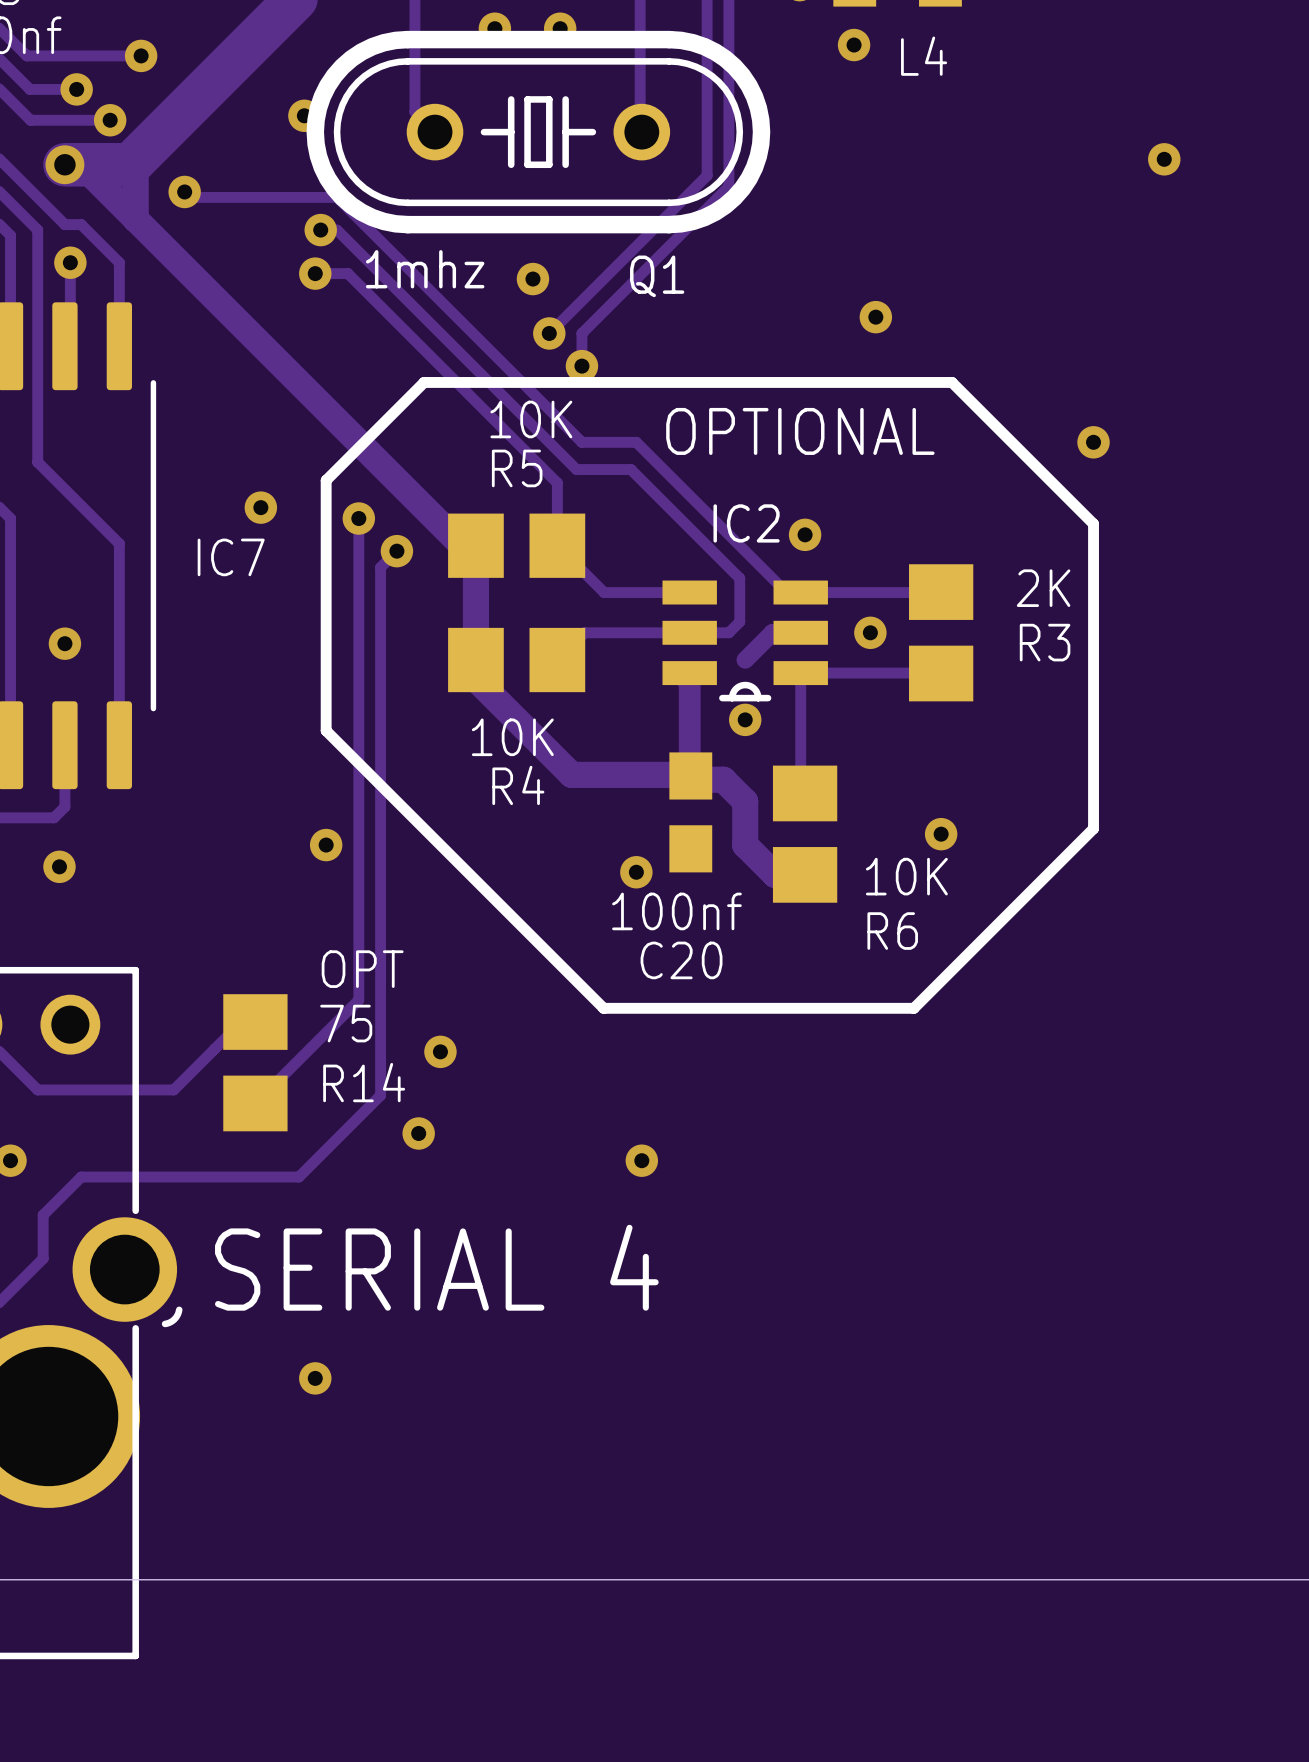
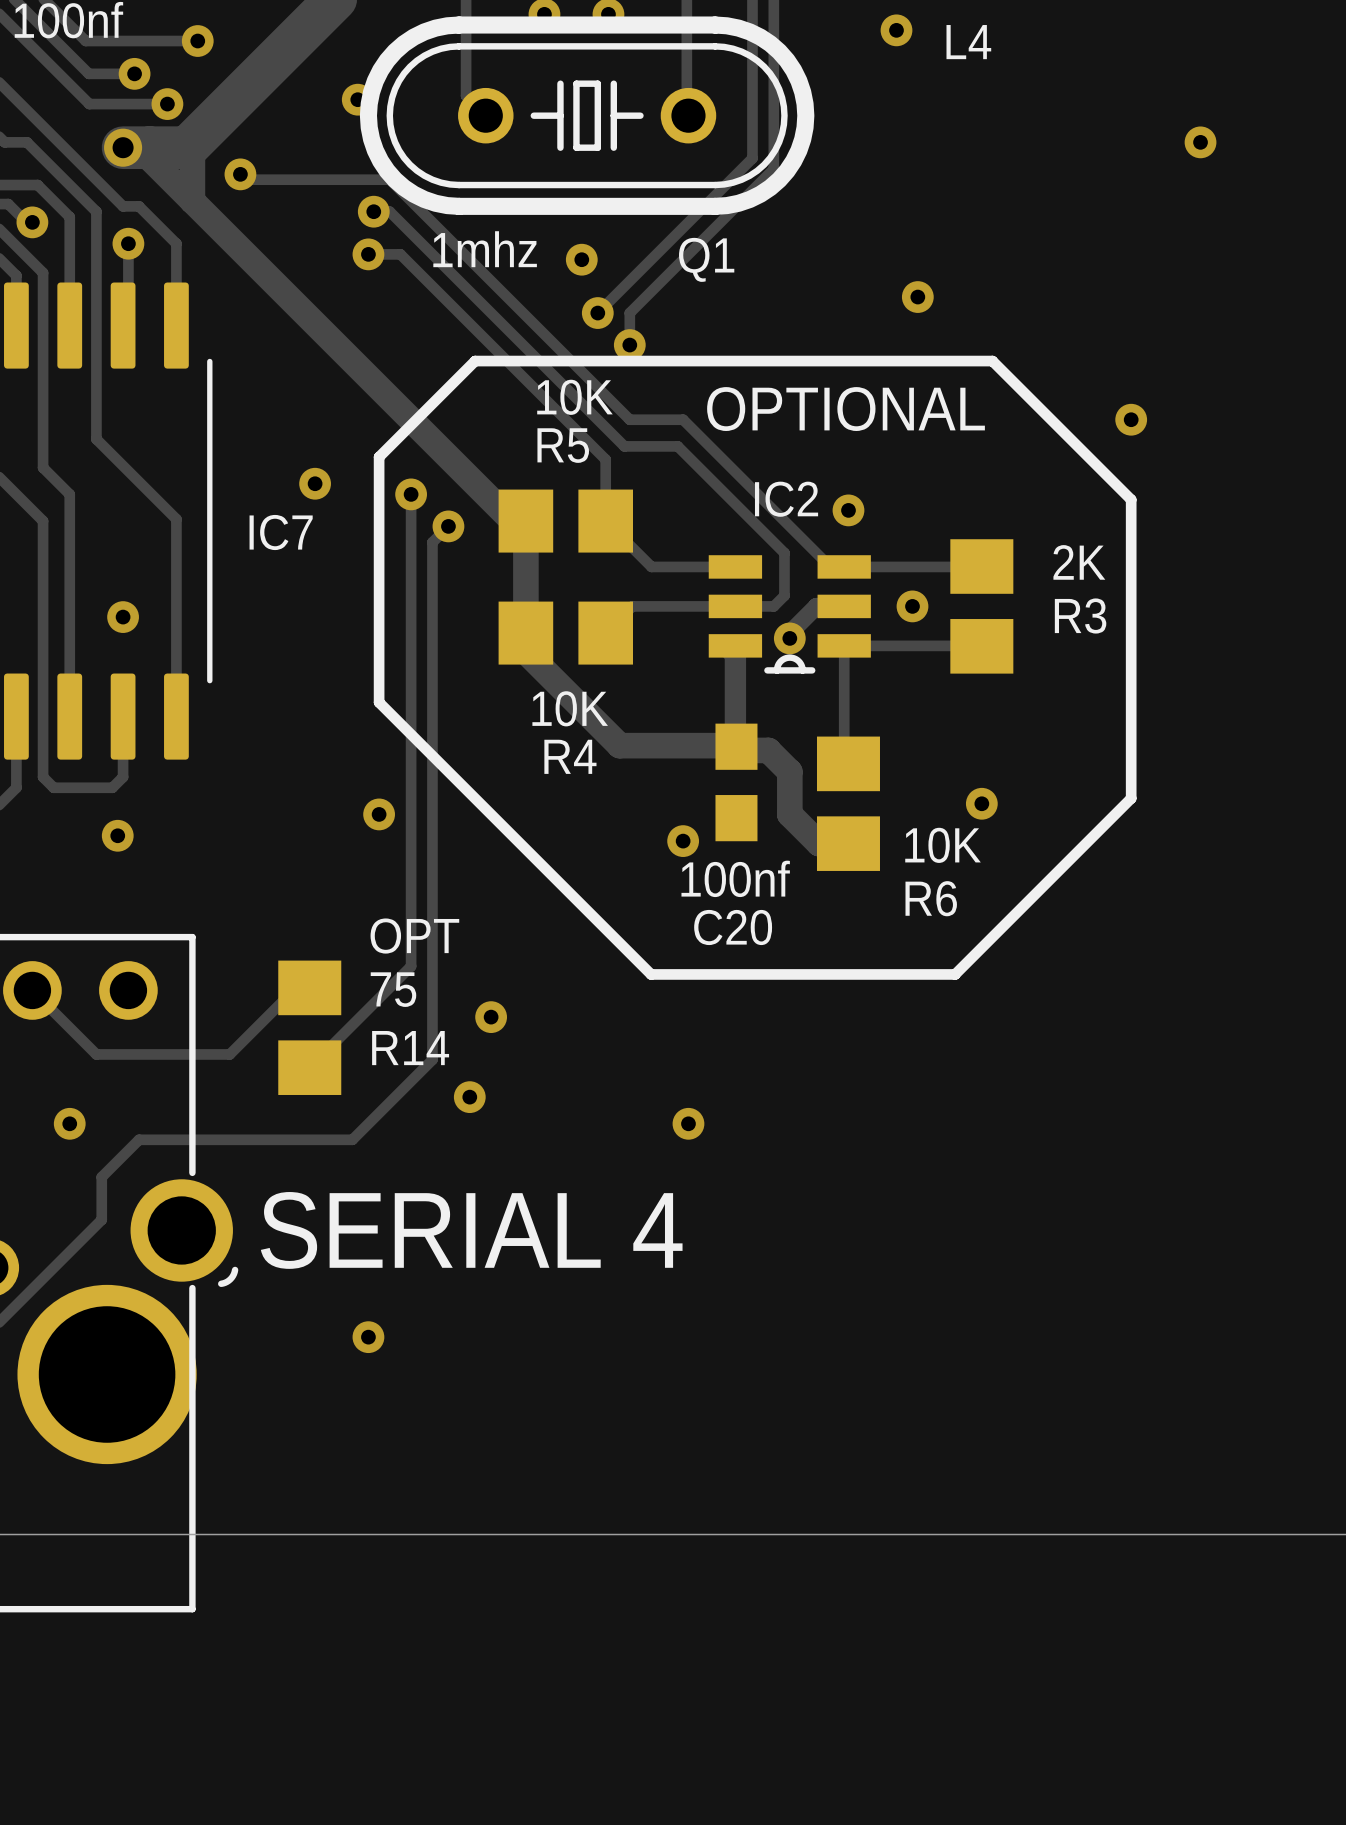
via position: (745, 719) -> (789, 638)

